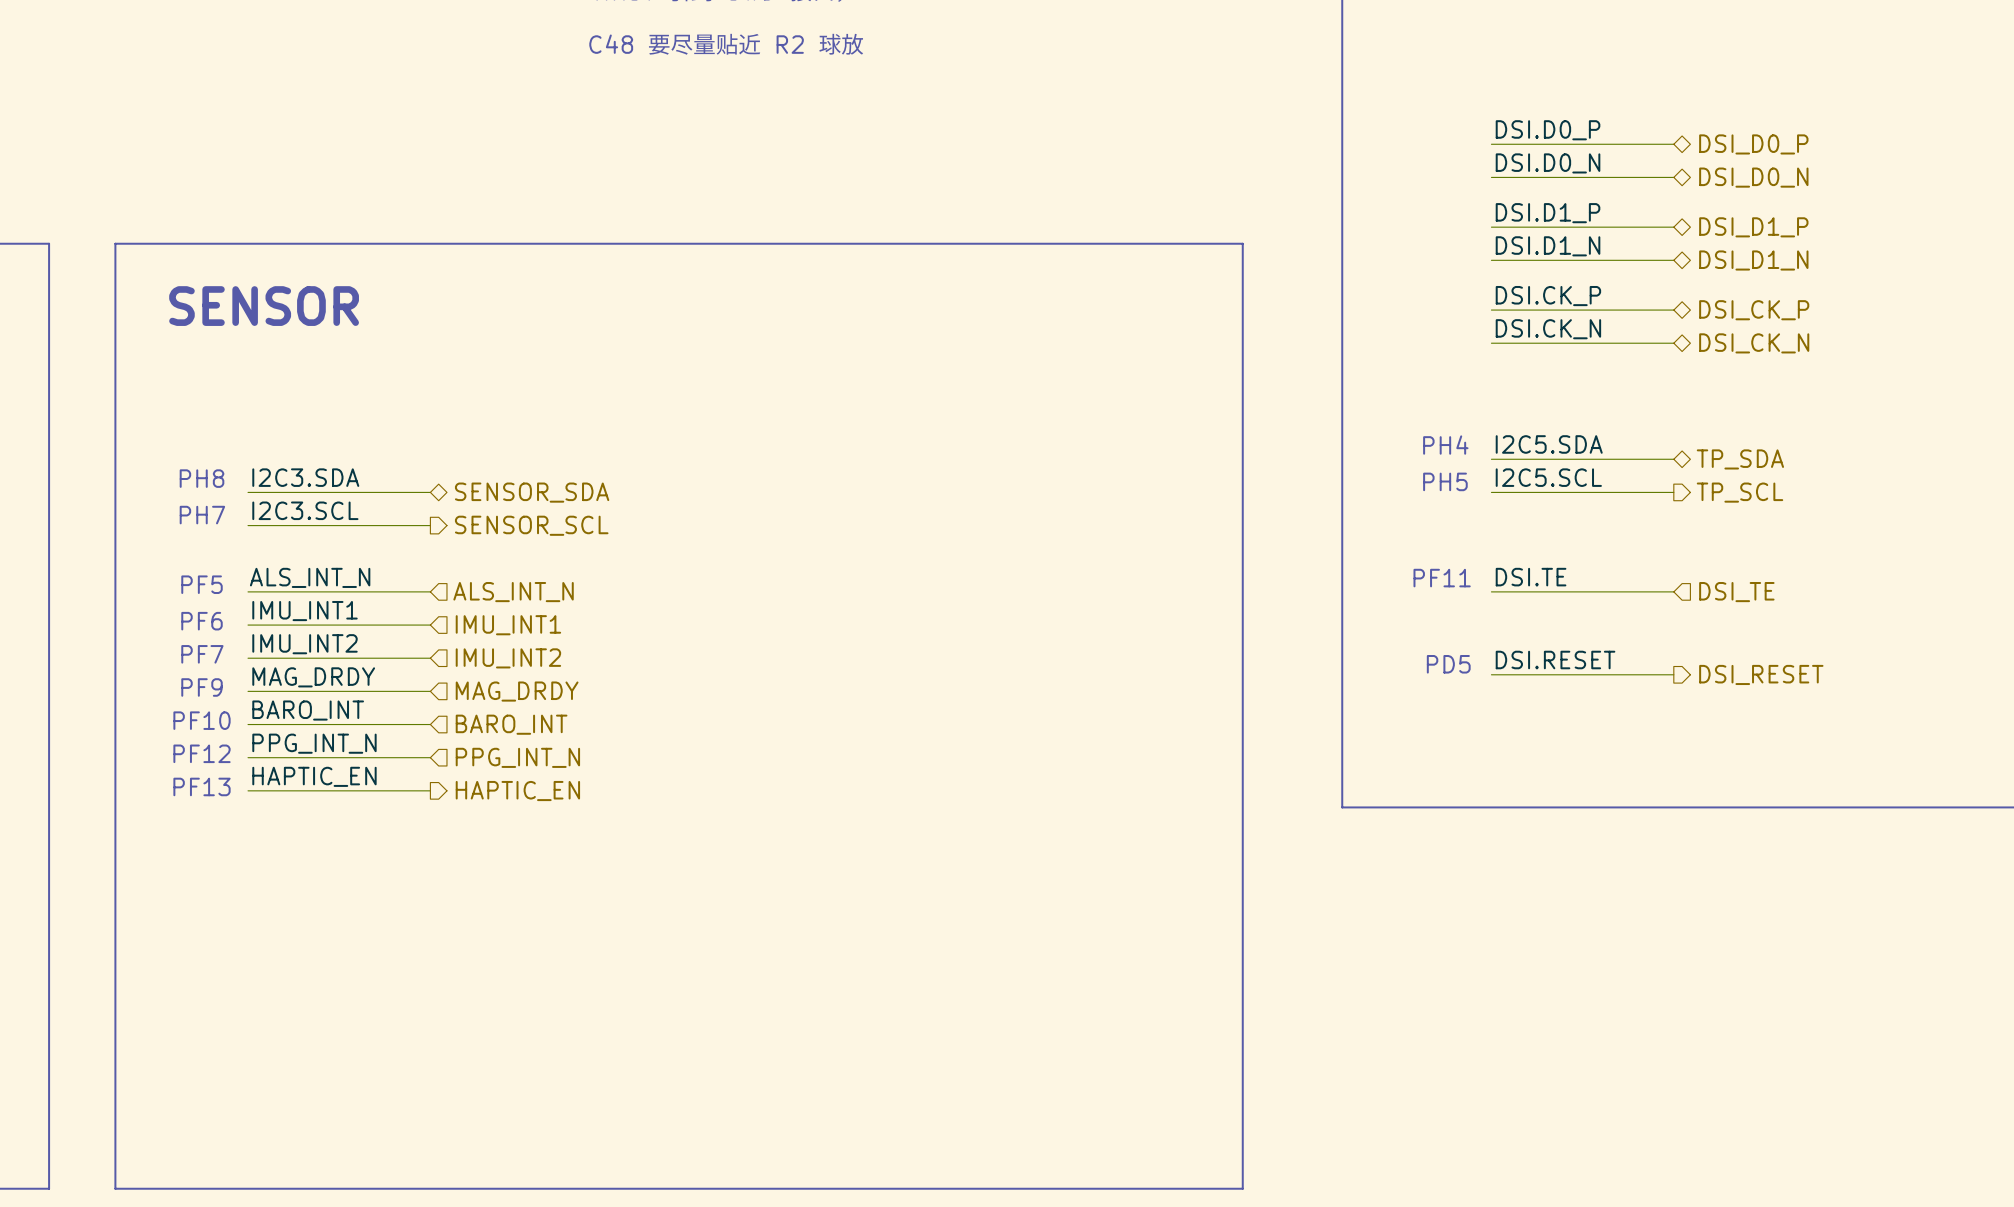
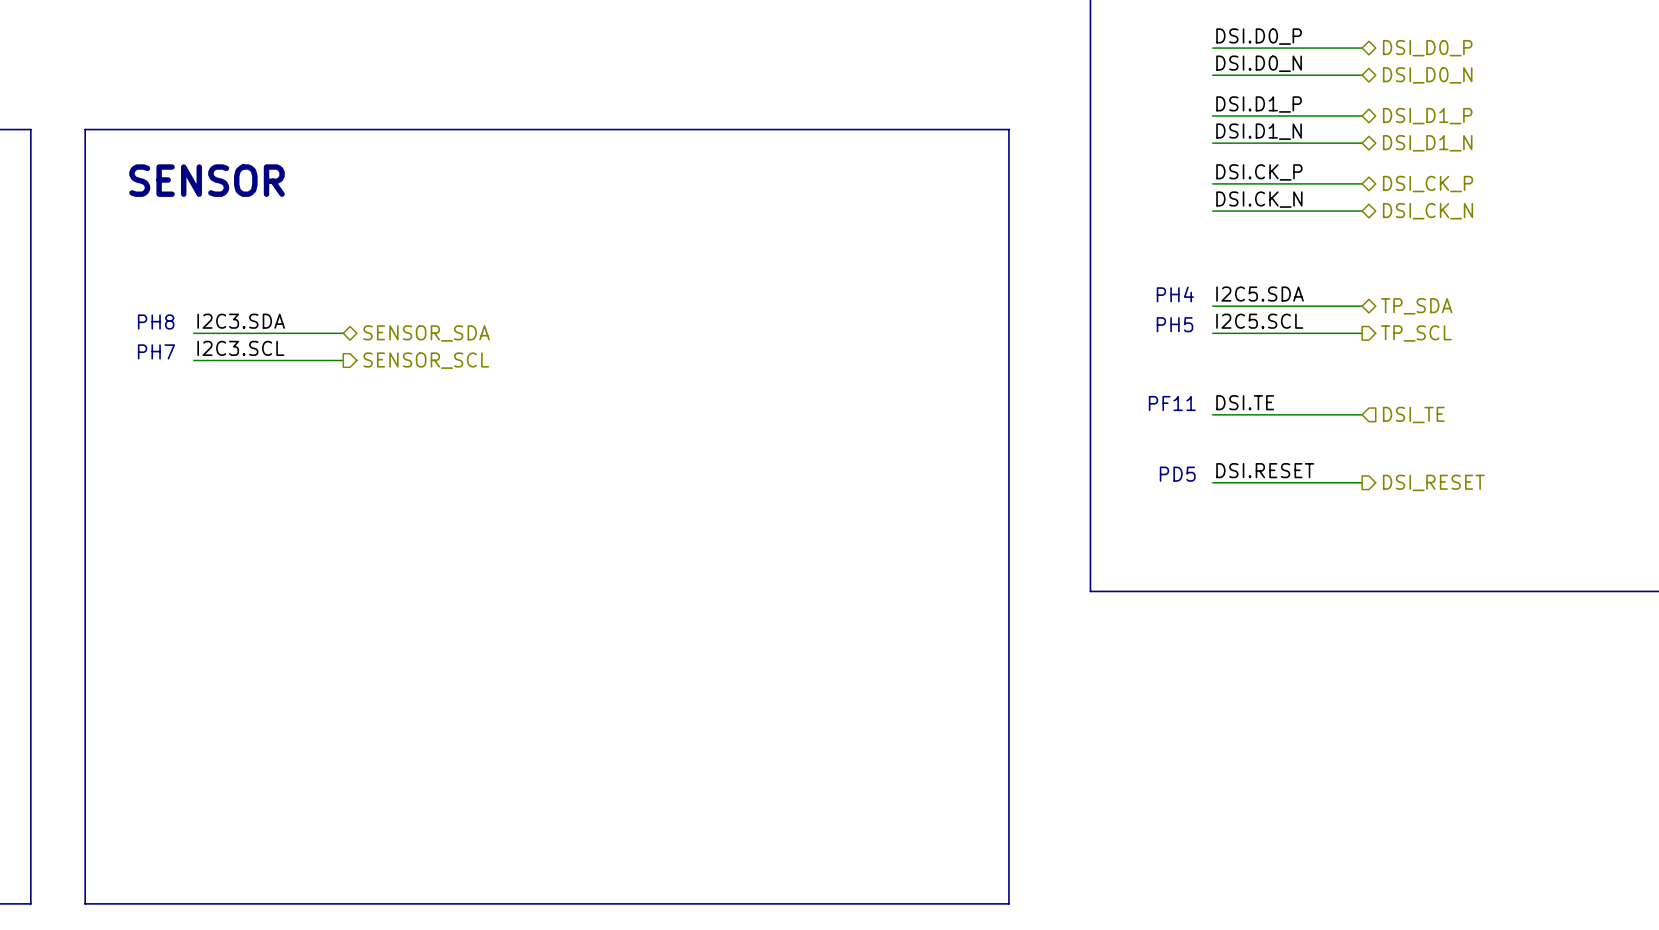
label: ALS_INT_N (310, 577) -> none
text: PF5 (202, 584) -> none
wire: (248, 591) (430, 591) -> none
hierarchical label: ALS_INT_N (513, 592) -> none
label: IMU_INT1 (304, 611) -> none
text: PF6 (202, 621) -> none
wire: (248, 625) (430, 625) -> none
hierarchical label: IMU_INT1 (508, 625) -> none
label: IMU_INT2 (304, 644) -> none
text: PF7 (202, 654) -> none
wire: (248, 658) (430, 658) -> none
hierarchical label: IMU_INT2 (508, 658) -> none
label: MAG_DRDY (313, 677) -> none
text: PF9 (202, 687) -> none
wire: (248, 691) (430, 691) -> none
hierarchical label: MAG_DRDY (517, 691) -> none
label: BARO_INT (308, 710) -> none
text: PF10 (202, 720) -> none
wire: (248, 724) (430, 724) -> none
hierarchical label: BARO_INT (511, 724) -> none
label: PPG_INT_N (314, 743) -> none
text: PF12 (202, 753) -> none
wire: (248, 757) (430, 757) -> none
hierarchical label: PPG_INT_N (517, 757) -> none
label: HAPTIC_EN (314, 776) -> none
text: PF13 (202, 786) -> none
wire: (248, 790) (430, 790) -> none
hierarchical label: HAPTIC_EN (517, 791) -> none

